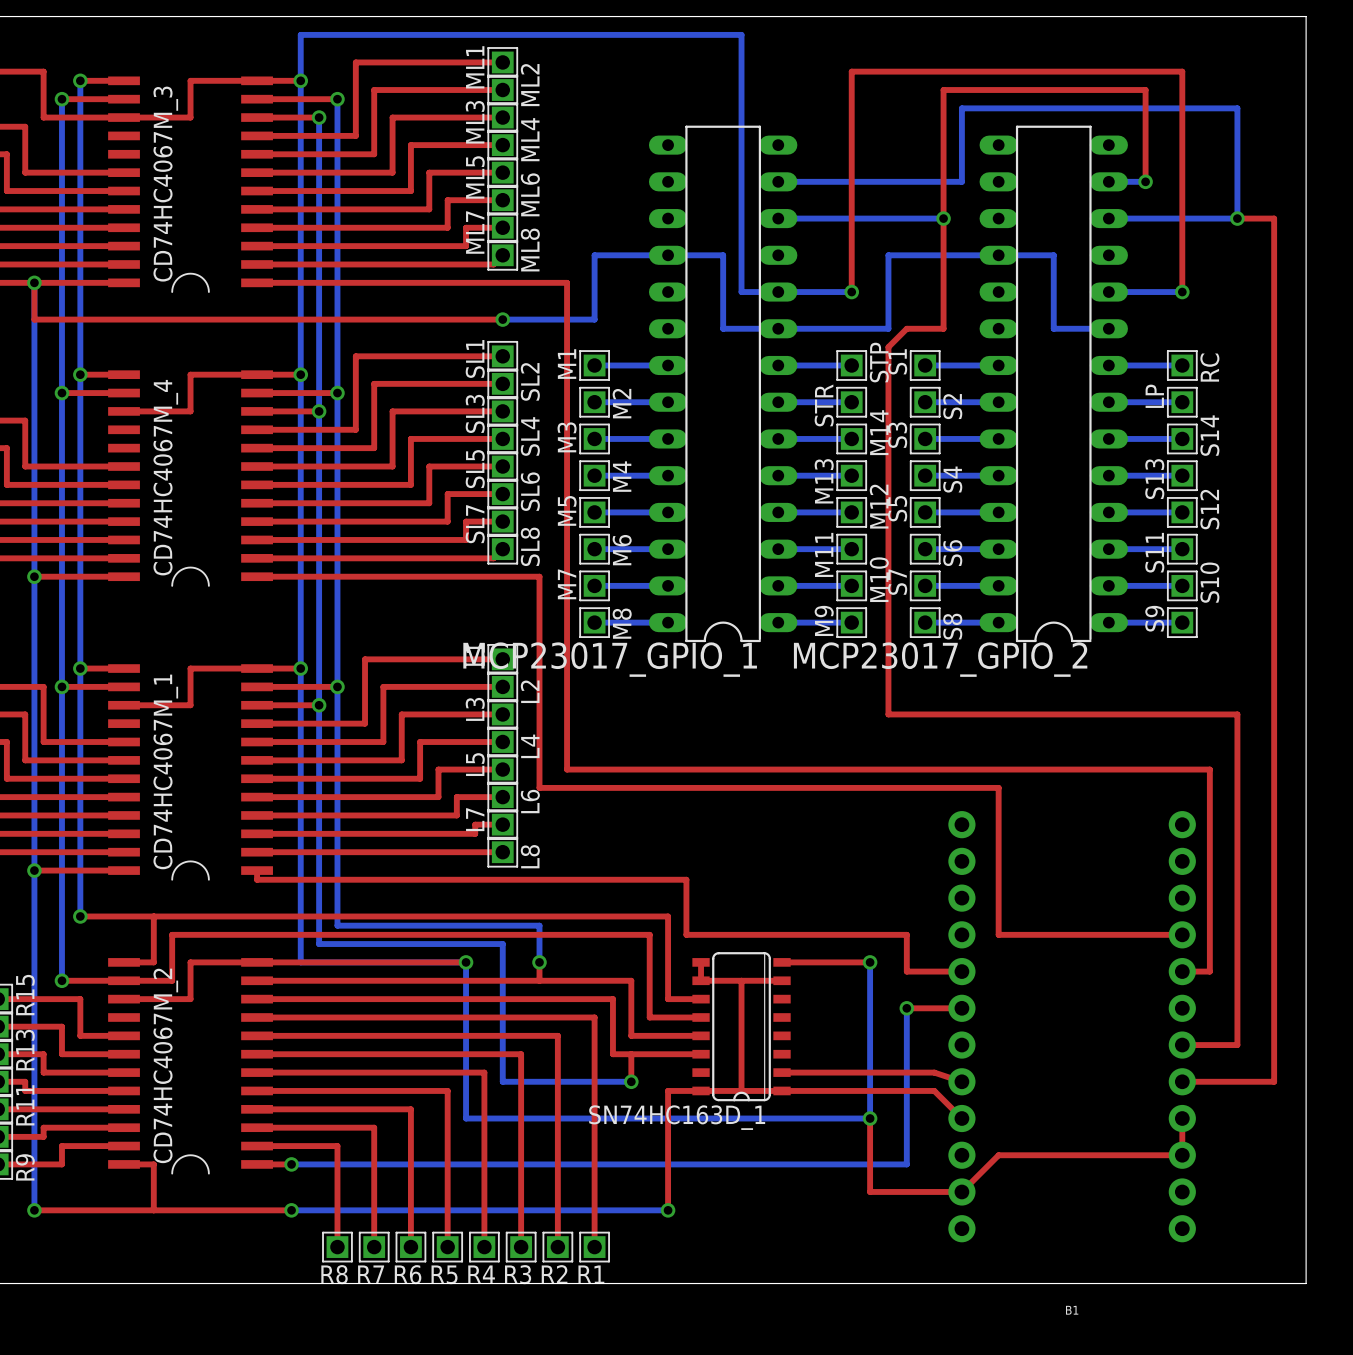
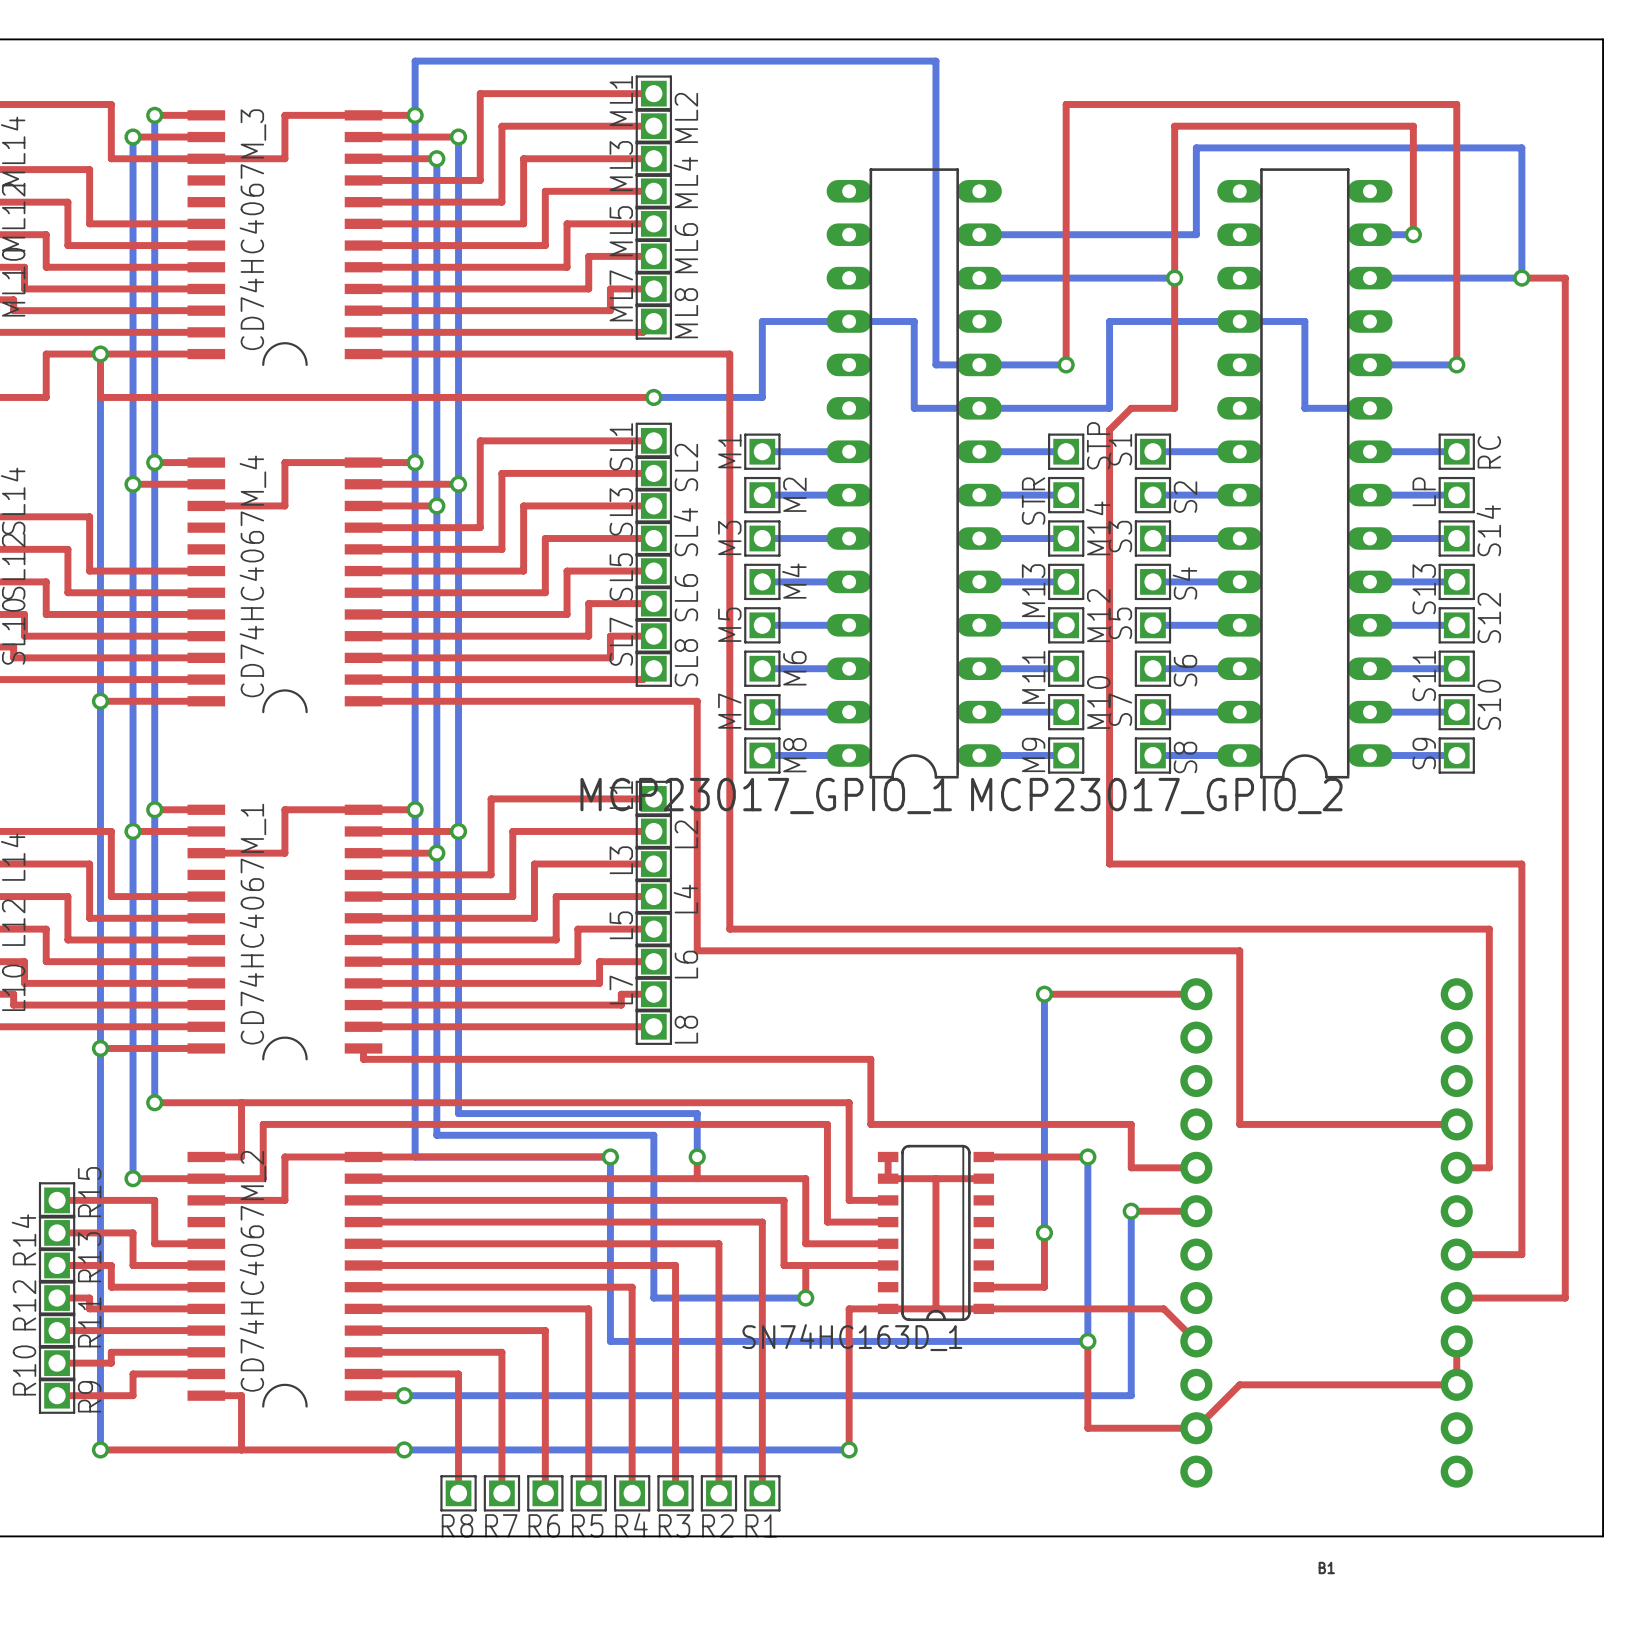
top track: none -> (1044, 994) (1196, 994)
bottom track: none -> (1044, 994) (1044, 1232)
via: none -> (1044, 994)
via: none -> (1044, 1232)
top track: (833, 1072) (934, 1072) (961, 1081) -> (1044, 1287) (1044, 1232)

